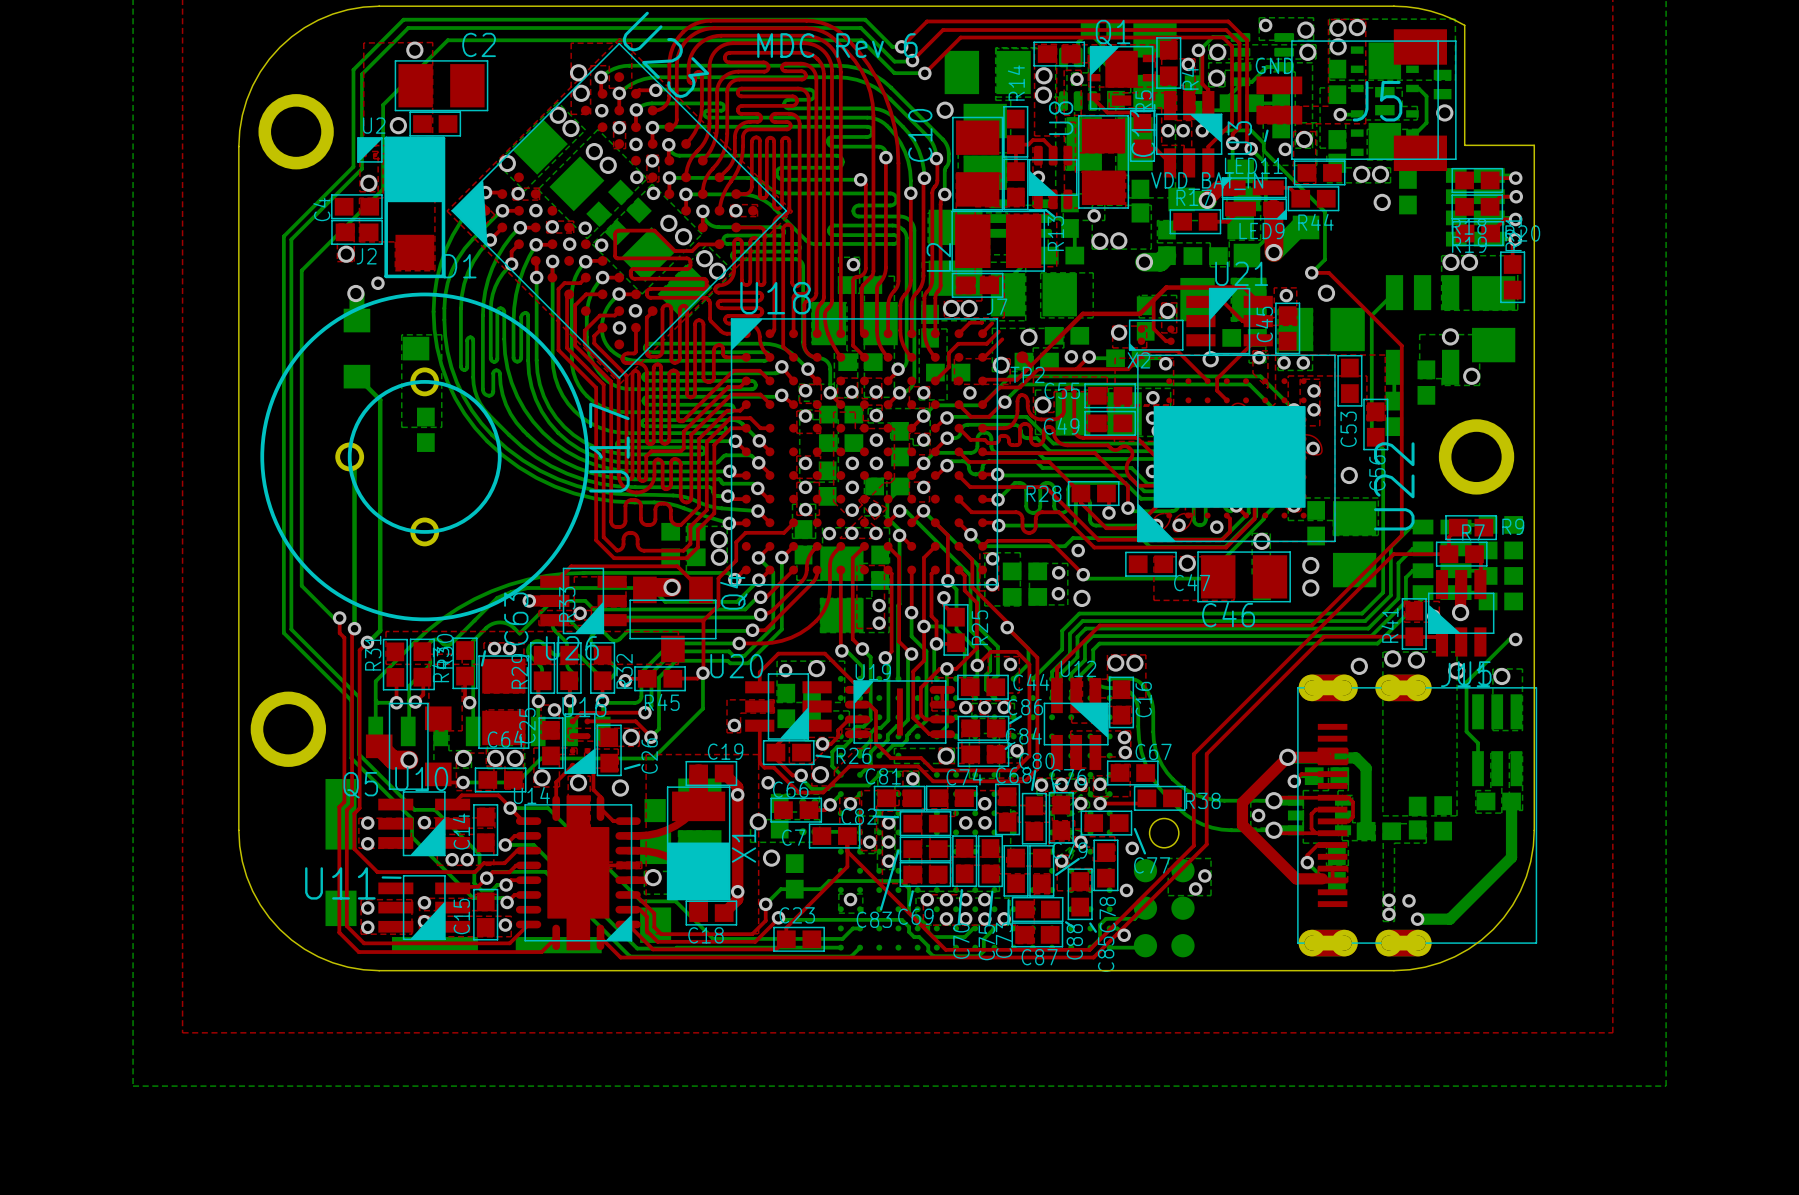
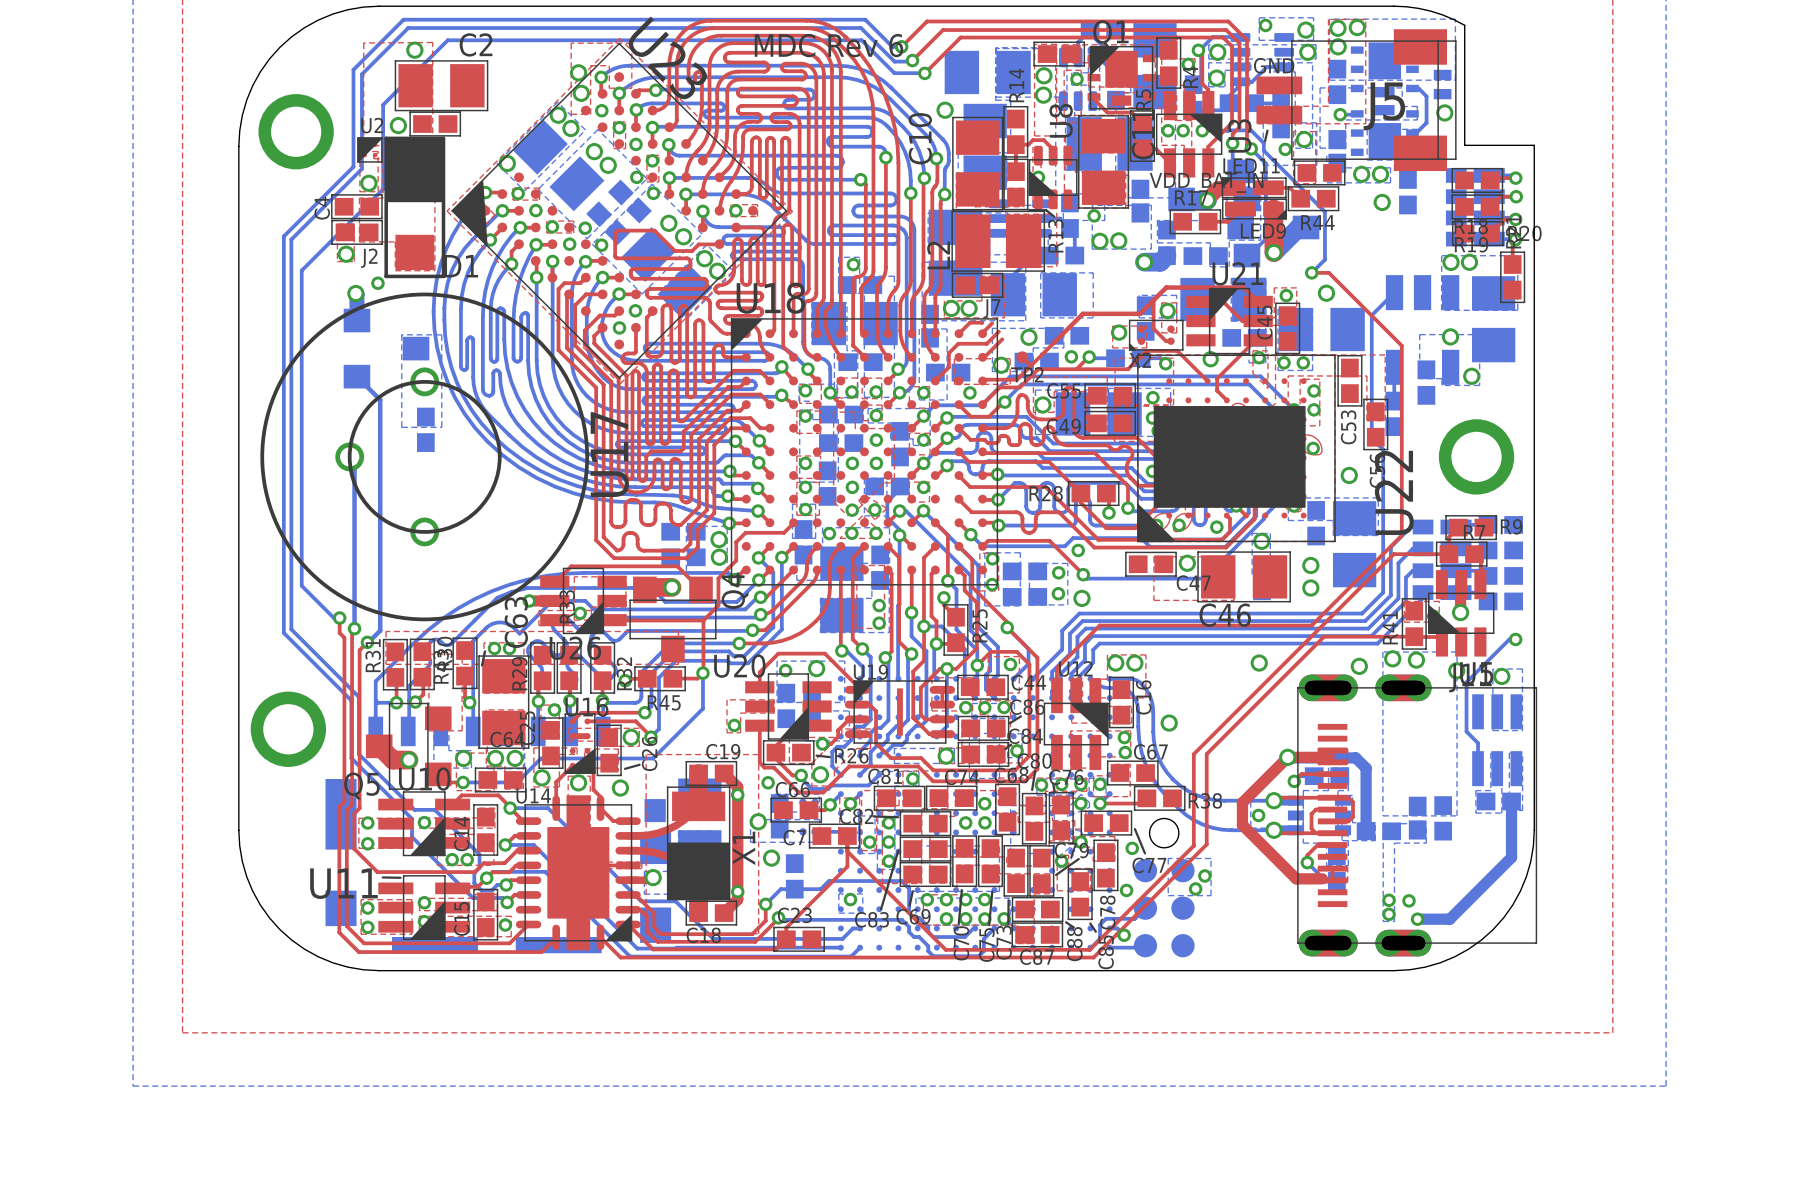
via: none -> (1259, 663)
via: none -> (1169, 723)

